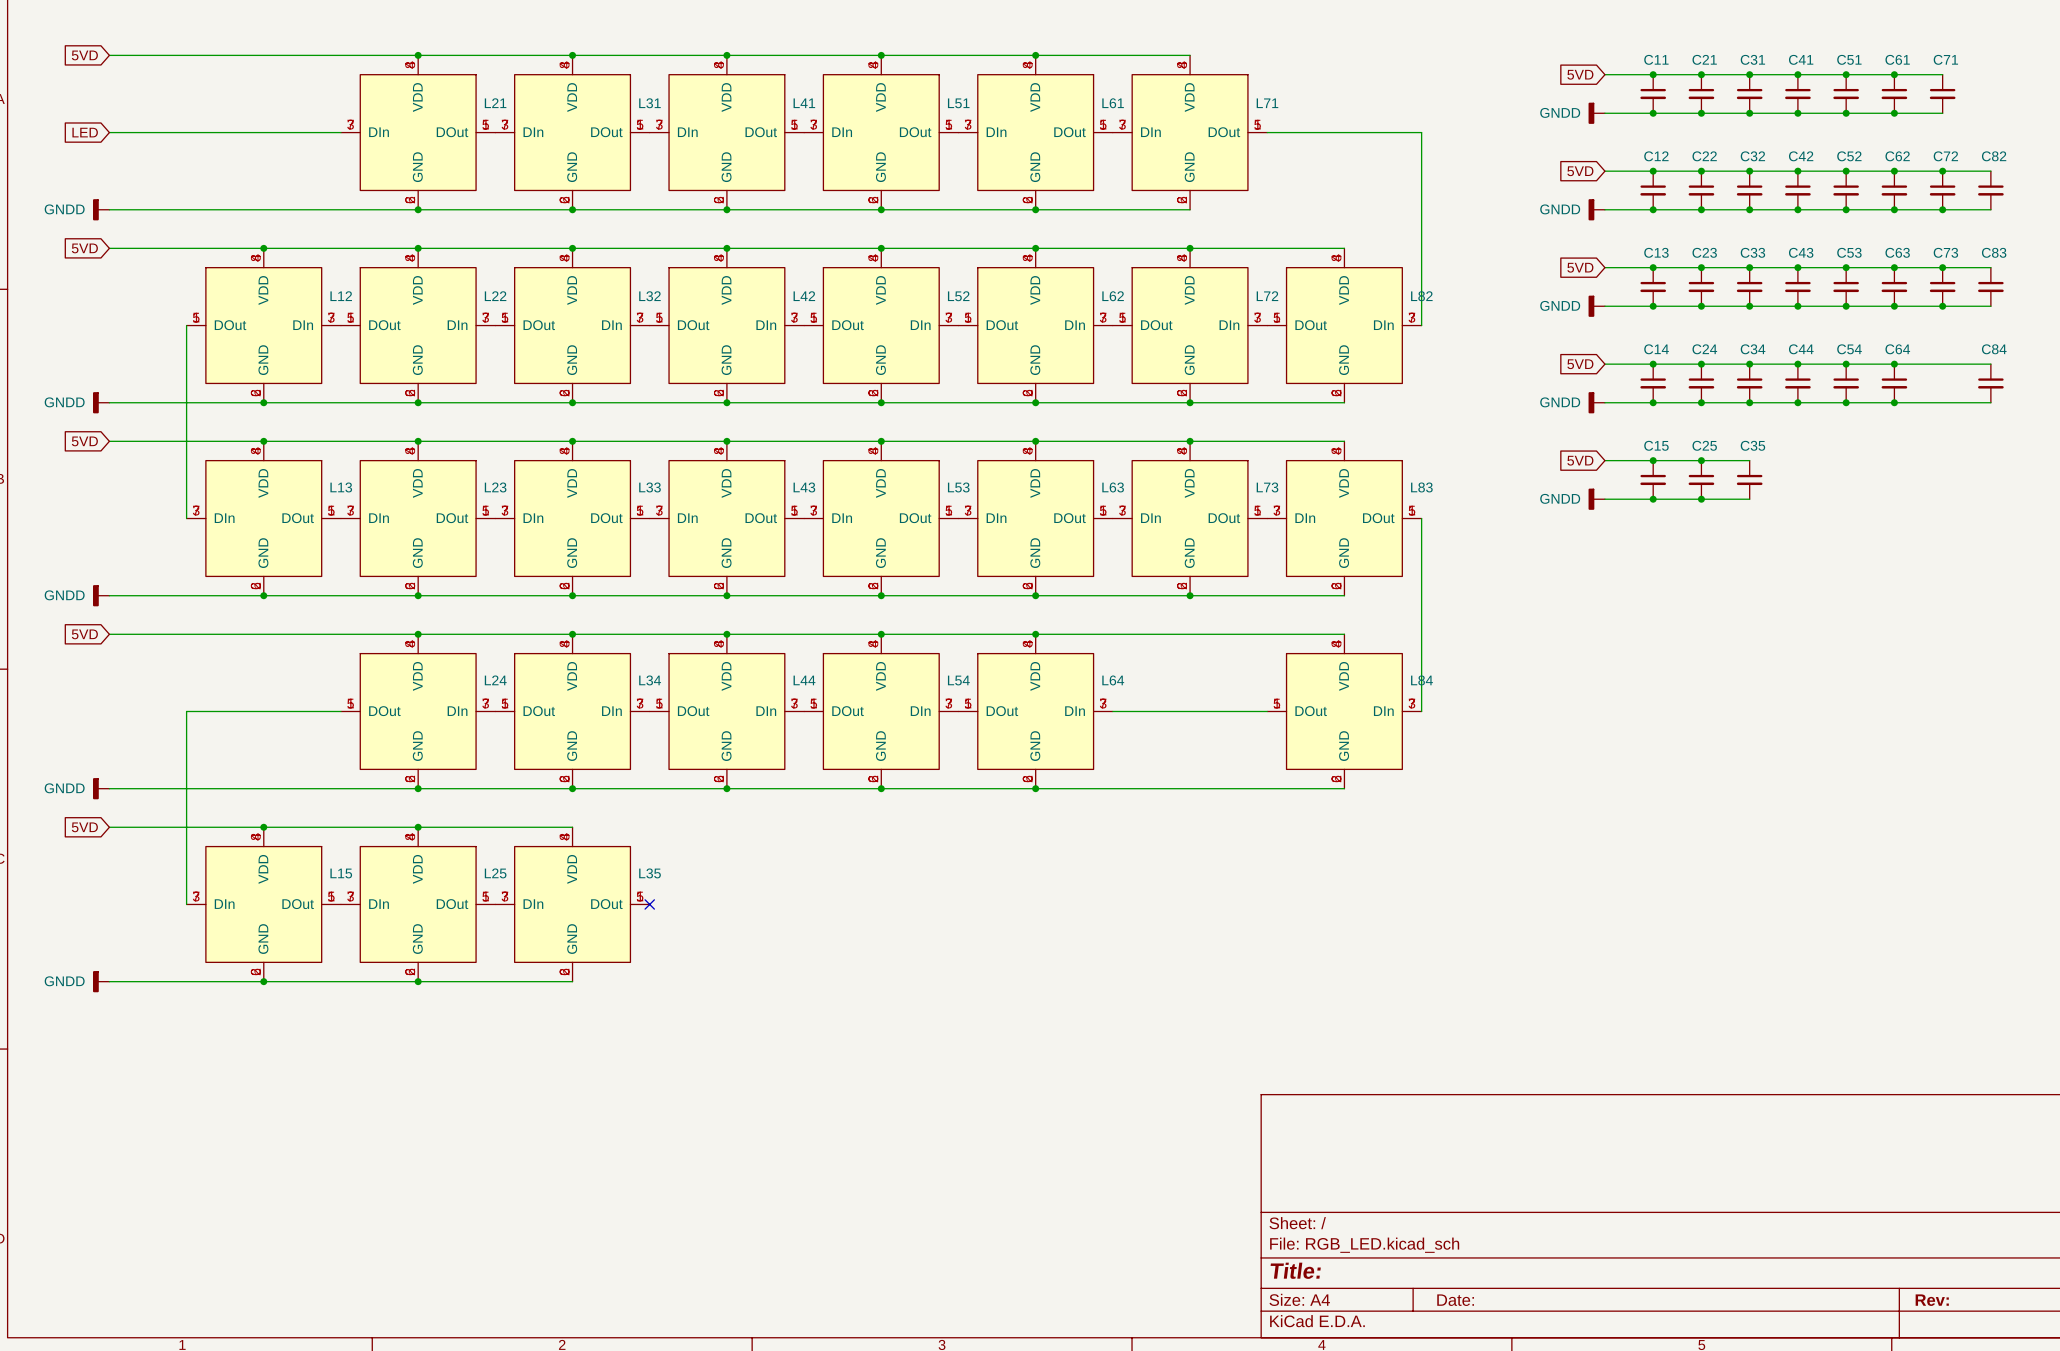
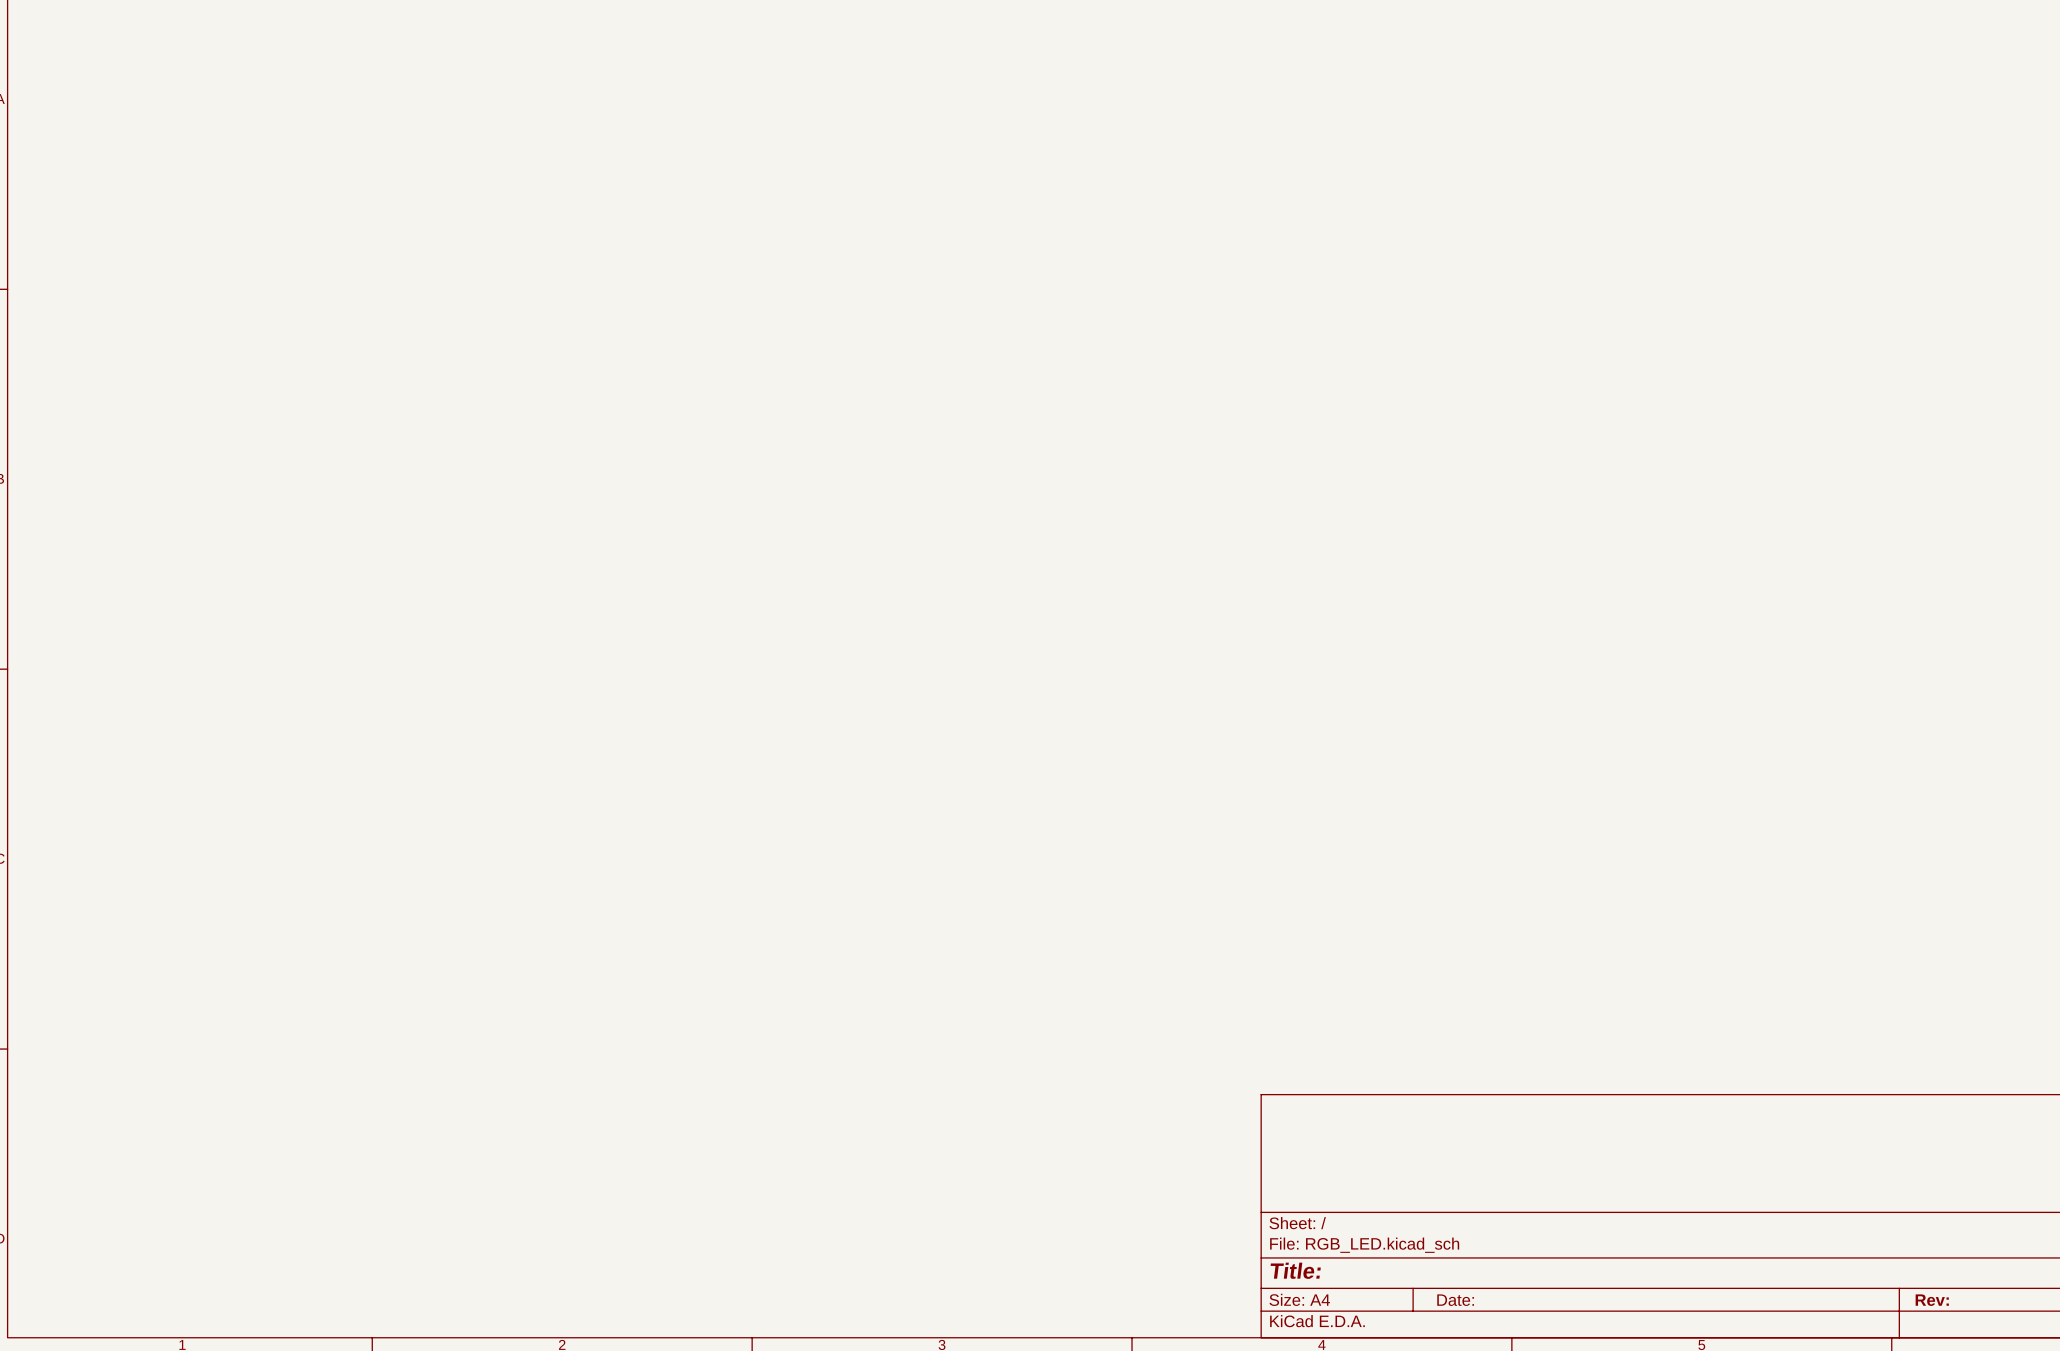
global label: 5VD (84, 55) -> none
wire: (109, 55) (1190, 55) -> none
junction: (418, 55) -> none
junction: (572, 55) -> none
junction: (726, 55) -> none
junction: (881, 55) -> none
junction: (1035, 55) -> none
global label: 5VD (1580, 74) -> none
wire: (1604, 74) (1942, 74) -> none
junction: (1653, 74) -> none
junction: (1701, 74) -> none
junction: (1749, 74) -> none
junction: (1797, 74) -> none
junction: (1846, 74) -> none
junction: (1894, 74) -> none
C11: (1653, 93) -> none
C21: (1701, 93) -> none
C31: (1749, 93) -> none
C41: (1797, 93) -> none
C51: (1846, 93) -> none
C61: (1894, 93) -> none
C71: (1942, 93) -> none
power symbol: GNDD (1596, 113) -> none
wire: (1604, 113) (1942, 113) -> none
junction: (1653, 113) -> none
junction: (1701, 113) -> none
junction: (1749, 113) -> none
junction: (1797, 113) -> none
junction: (1846, 113) -> none
junction: (1894, 113) -> none
global label: LED (85, 132) -> none
wire: (109, 132) (340, 132) -> none
L21: (418, 132) -> none
L31: (572, 132) -> none
L41: (726, 132) -> none
L51: (881, 132) -> none
L61: (1035, 132) -> none
L71: (1190, 132) -> none
wire: (1267, 132) (1421, 132) (1421, 325) -> none
global label: 5VD (1580, 171) -> none
wire: (1604, 171) (1990, 171) -> none
junction: (1653, 171) -> none
junction: (1701, 171) -> none
junction: (1749, 171) -> none
junction: (1797, 171) -> none
junction: (1846, 171) -> none
junction: (1894, 171) -> none
junction: (1942, 171) -> none
C12: (1653, 190) -> none
C22: (1701, 190) -> none
C32: (1749, 190) -> none
C42: (1797, 190) -> none
C52: (1846, 190) -> none
C62: (1894, 190) -> none
C72: (1942, 190) -> none
C82: (1990, 190) -> none
power symbol: GNDD (101, 209) -> none
wire: (109, 209) (1190, 209) -> none
junction: (418, 209) -> none
junction: (572, 209) -> none
junction: (726, 209) -> none
junction: (881, 209) -> none
junction: (1035, 209) -> none
power symbol: GNDD (1596, 209) -> none
wire: (1604, 209) (1990, 209) -> none
junction: (1653, 209) -> none
junction: (1701, 209) -> none
junction: (1749, 209) -> none
junction: (1797, 209) -> none
junction: (1846, 209) -> none
junction: (1894, 209) -> none
junction: (1942, 209) -> none
global label: 5VD (84, 248) -> none
wire: (109, 248) (1344, 248) -> none
junction: (263, 248) -> none
junction: (418, 248) -> none
junction: (572, 248) -> none
junction: (726, 248) -> none
junction: (881, 248) -> none
junction: (1035, 248) -> none
junction: (1190, 248) -> none
global label: 5VD (1580, 267) -> none
wire: (1604, 267) (1990, 267) -> none
junction: (1653, 267) -> none
junction: (1701, 267) -> none
junction: (1749, 267) -> none
junction: (1797, 267) -> none
junction: (1846, 267) -> none
junction: (1894, 267) -> none
junction: (1942, 267) -> none
C13: (1653, 286) -> none
C23: (1701, 286) -> none
C33: (1749, 286) -> none
C43: (1797, 286) -> none
C53: (1846, 286) -> none
C63: (1894, 286) -> none
C73: (1942, 286) -> none
C83: (1990, 286) -> none
power symbol: GNDD (1596, 306) -> none
wire: (1604, 306) (1990, 306) -> none
junction: (1653, 306) -> none
junction: (1701, 306) -> none
junction: (1749, 306) -> none
junction: (1797, 306) -> none
junction: (1846, 306) -> none
junction: (1894, 306) -> none
junction: (1942, 306) -> none
wire: (186, 325) (186, 518) -> none
L12: (263, 325) -> none
L22: (418, 325) -> none
L32: (572, 325) -> none
L42: (726, 325) -> none
L52: (881, 325) -> none
L62: (1035, 325) -> none
L72: (1190, 325) -> none
L82: (1344, 325) -> none
global label: 5VD (1580, 364) -> none
wire: (1604, 364) (1990, 364) -> none
junction: (1653, 364) -> none
junction: (1701, 364) -> none
junction: (1749, 364) -> none
junction: (1797, 364) -> none
junction: (1846, 364) -> none
junction: (1894, 364) -> none
C14: (1653, 383) -> none
C24: (1701, 383) -> none
C34: (1749, 383) -> none
C44: (1797, 383) -> none
C54: (1846, 383) -> none
C64: (1894, 383) -> none
C84: (1990, 383) -> none
power symbol: GNDD (101, 402) -> none
wire: (109, 402) (1344, 402) -> none
junction: (263, 402) -> none
junction: (418, 402) -> none
junction: (572, 402) -> none
junction: (726, 402) -> none
junction: (881, 402) -> none
junction: (1035, 402) -> none
junction: (1190, 402) -> none
power symbol: GNDD (1596, 402) -> none
wire: (1604, 402) (1990, 402) -> none
junction: (1653, 402) -> none
junction: (1701, 402) -> none
junction: (1749, 402) -> none
junction: (1797, 402) -> none
junction: (1846, 402) -> none
junction: (1894, 402) -> none
global label: 5VD (84, 441) -> none
wire: (109, 441) (1344, 441) -> none
junction: (263, 441) -> none
junction: (418, 441) -> none
junction: (572, 441) -> none
junction: (726, 441) -> none
junction: (881, 441) -> none
junction: (1035, 441) -> none
junction: (1190, 441) -> none
global label: 5VD (1580, 460) -> none
wire: (1604, 460) (1749, 460) -> none
junction: (1653, 460) -> none
junction: (1701, 460) -> none
C15: (1653, 479) -> none
C25: (1701, 479) -> none
C35: (1749, 479) -> none
power symbol: GNDD (1596, 499) -> none
wire: (1604, 499) (1749, 499) -> none
junction: (1653, 499) -> none
junction: (1701, 499) -> none
L13: (263, 518) -> none
L23: (418, 518) -> none
L33: (572, 518) -> none
L43: (726, 518) -> none
L53: (881, 518) -> none
L63: (1035, 518) -> none
L73: (1190, 518) -> none
L83: (1344, 518) -> none
wire: (1421, 518) (1421, 711) -> none
power symbol: GNDD (101, 595) -> none
wire: (109, 595) (1344, 595) -> none
junction: (263, 595) -> none
junction: (418, 595) -> none
junction: (572, 595) -> none
junction: (726, 595) -> none
junction: (881, 595) -> none
junction: (1035, 595) -> none
junction: (1190, 595) -> none
global label: 5VD (84, 634) -> none
wire: (109, 634) (1344, 634) -> none
junction: (418, 634) -> none
junction: (572, 634) -> none
junction: (726, 634) -> none
junction: (881, 634) -> none
junction: (1035, 634) -> none
wire: (340, 711) (186, 711) (186, 904) -> none
L24: (418, 711) -> none
L34: (572, 711) -> none
L44: (726, 711) -> none
L54: (881, 711) -> none
L64: (1035, 711) -> none
wire: (1112, 711) (1267, 711) -> none
L84: (1344, 711) -> none
power symbol: GNDD (101, 788) -> none
wire: (109, 788) (1344, 788) -> none
junction: (418, 788) -> none
junction: (572, 788) -> none
junction: (726, 788) -> none
junction: (881, 788) -> none
junction: (1035, 788) -> none
global label: 5VD (84, 827) -> none
wire: (109, 827) (572, 827) -> none
junction: (263, 827) -> none
junction: (418, 827) -> none
L15: (263, 904) -> none
L25: (418, 904) -> none
L35: (572, 904) -> none
no-connect mark: (649, 904) -> none
power symbol: GNDD (101, 981) -> none
wire: (109, 981) (572, 981) -> none
junction: (263, 981) -> none
junction: (418, 981) -> none

